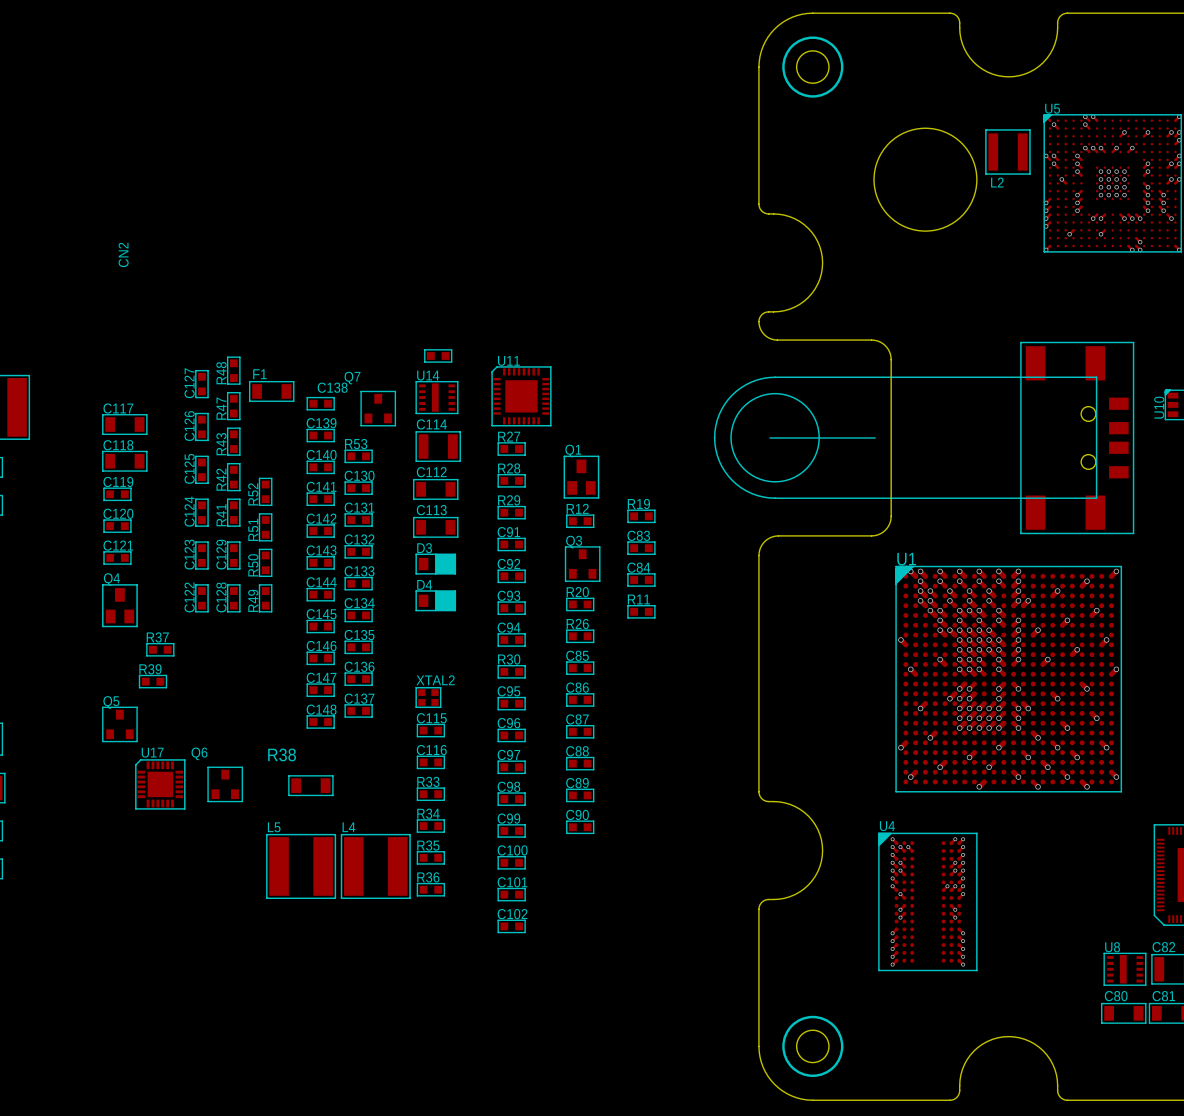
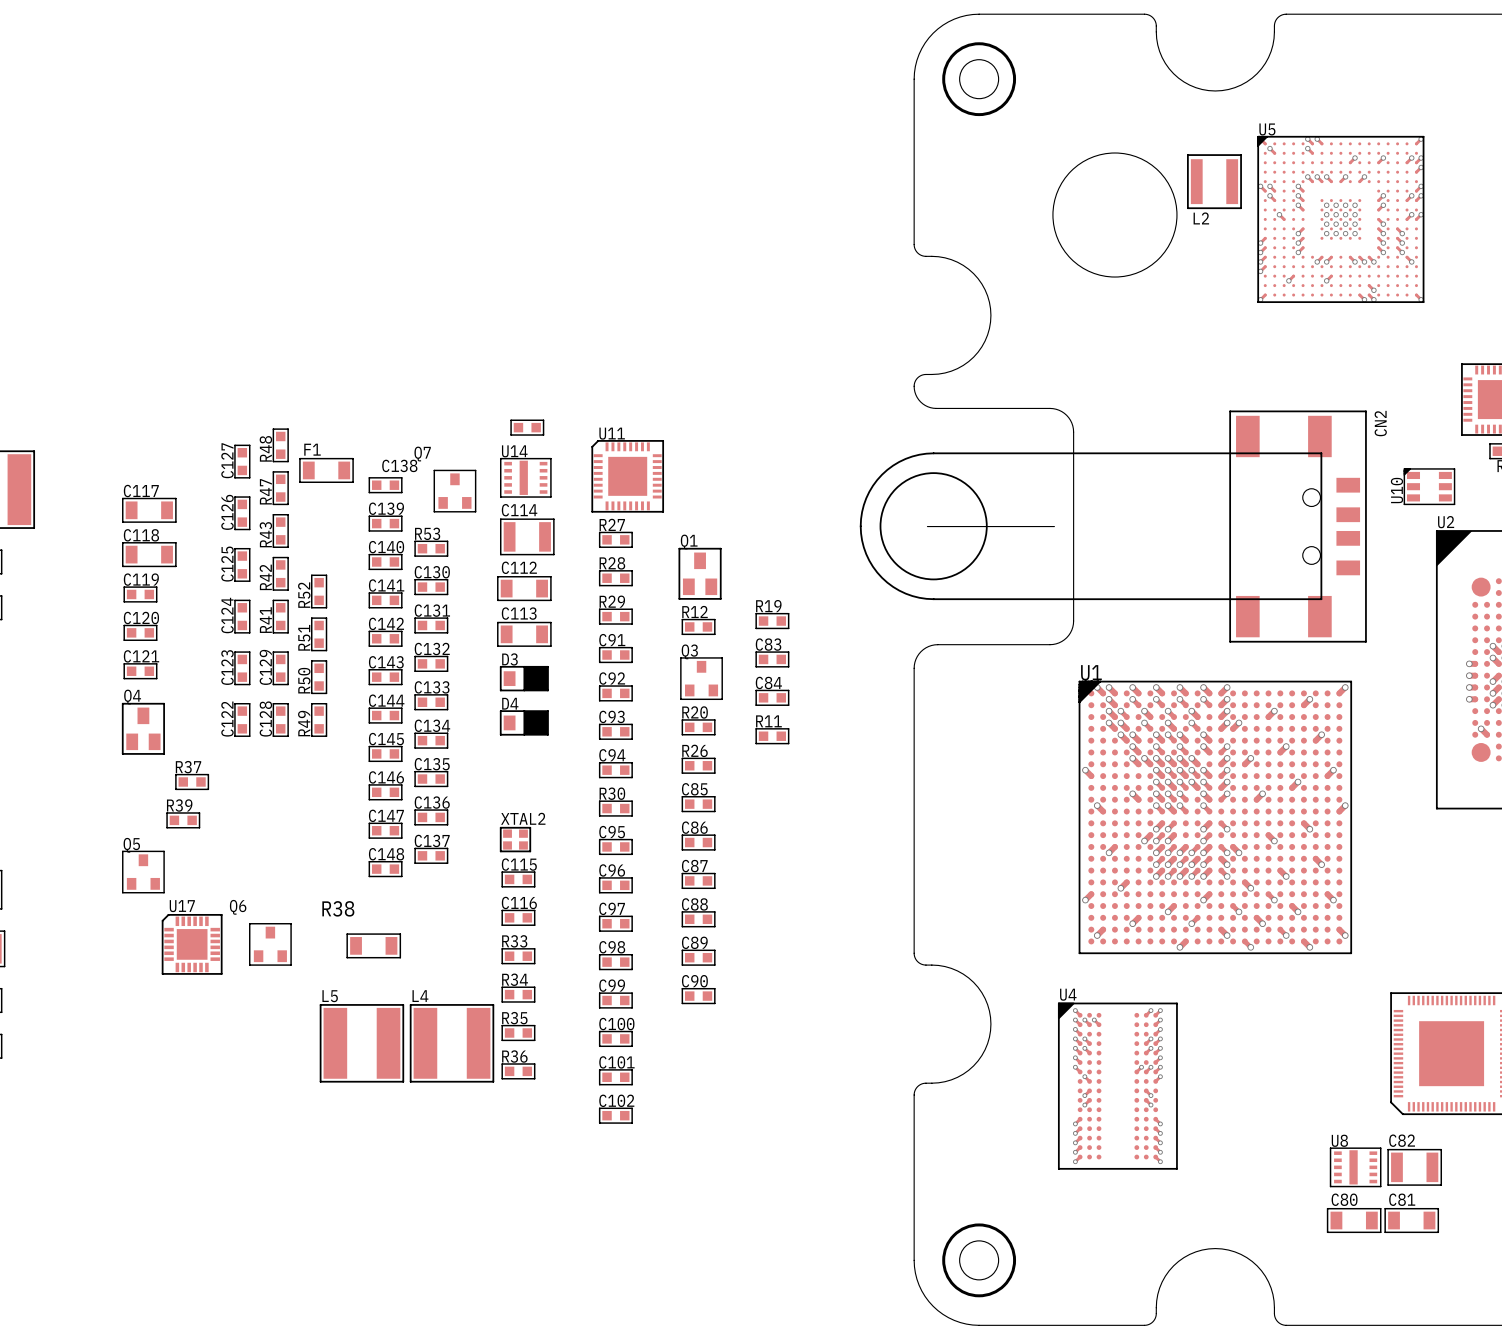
CN2 name position: CN2 (123, 254) -> CN2 (1380, 423)

